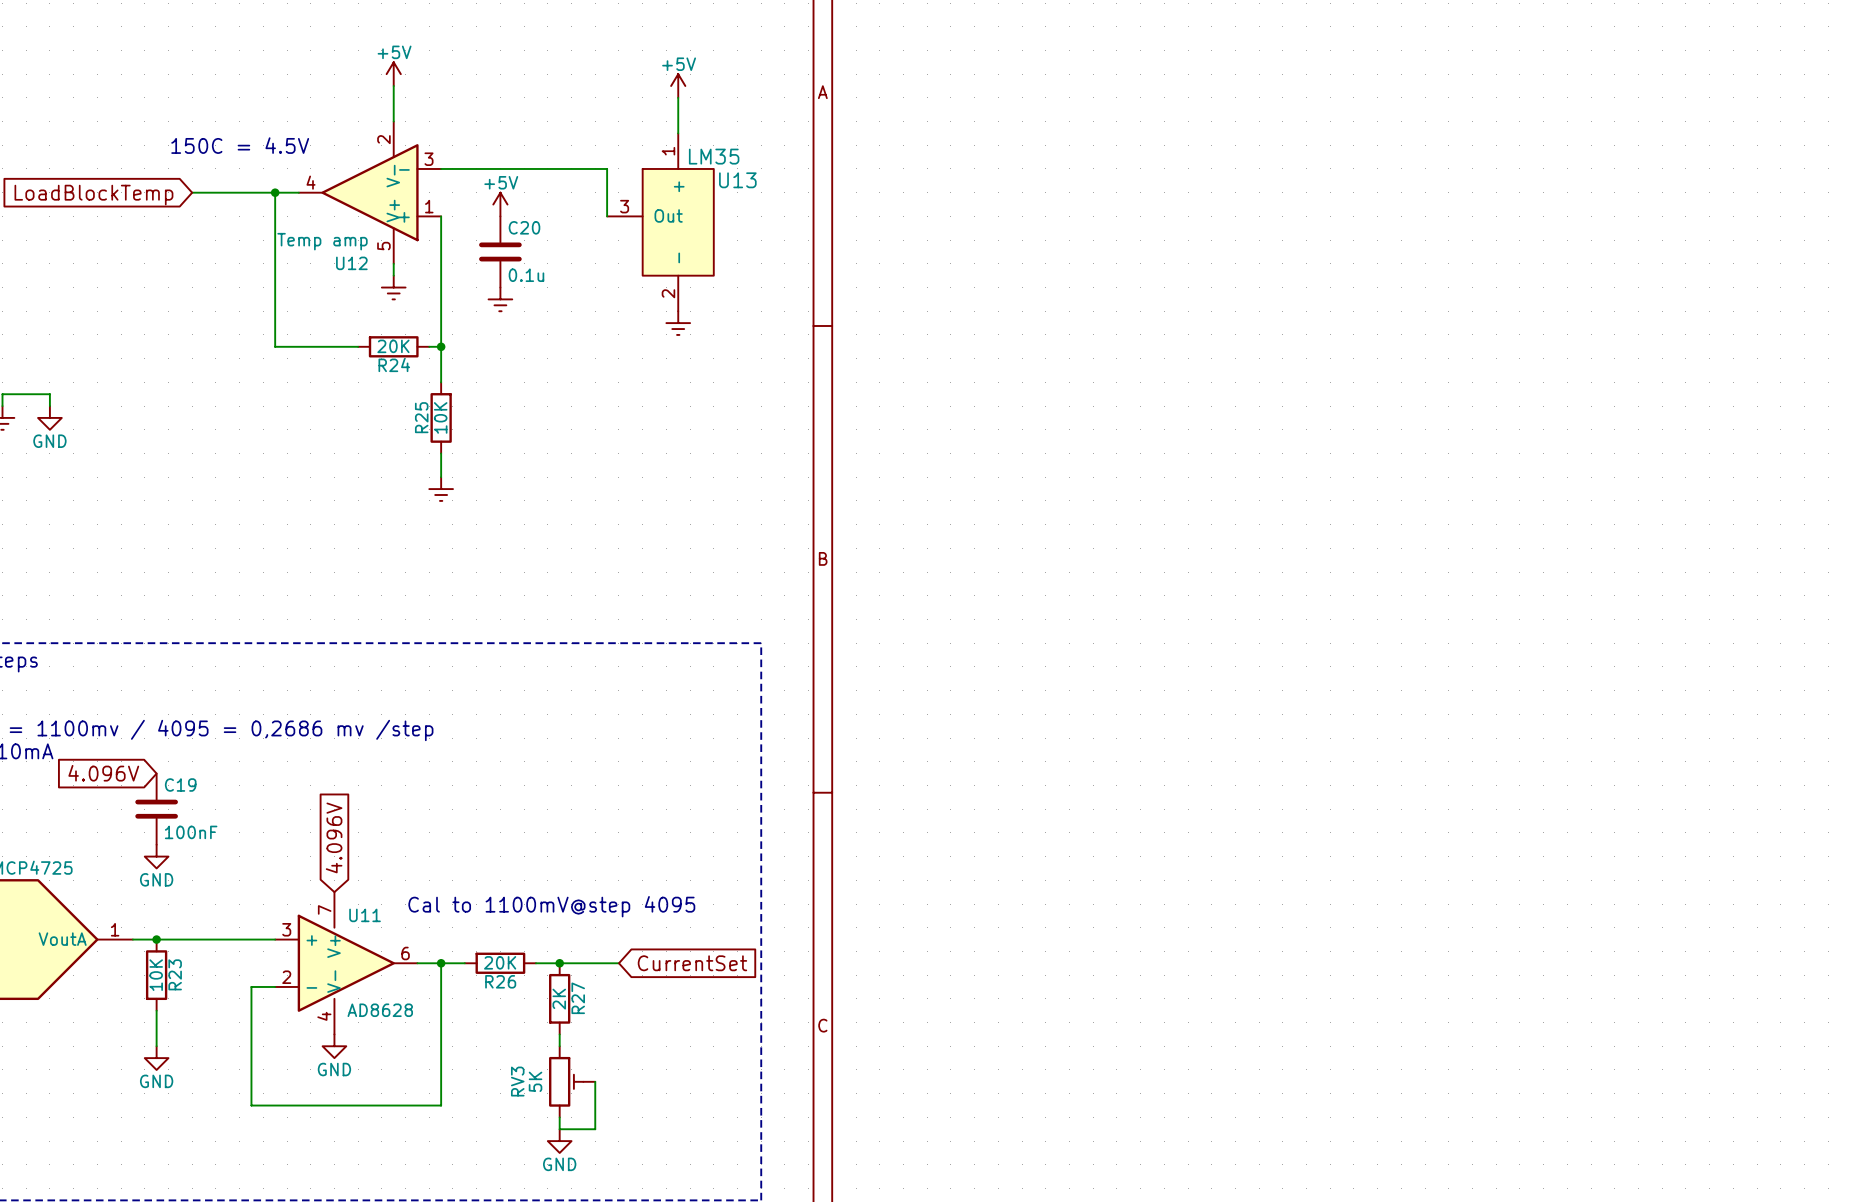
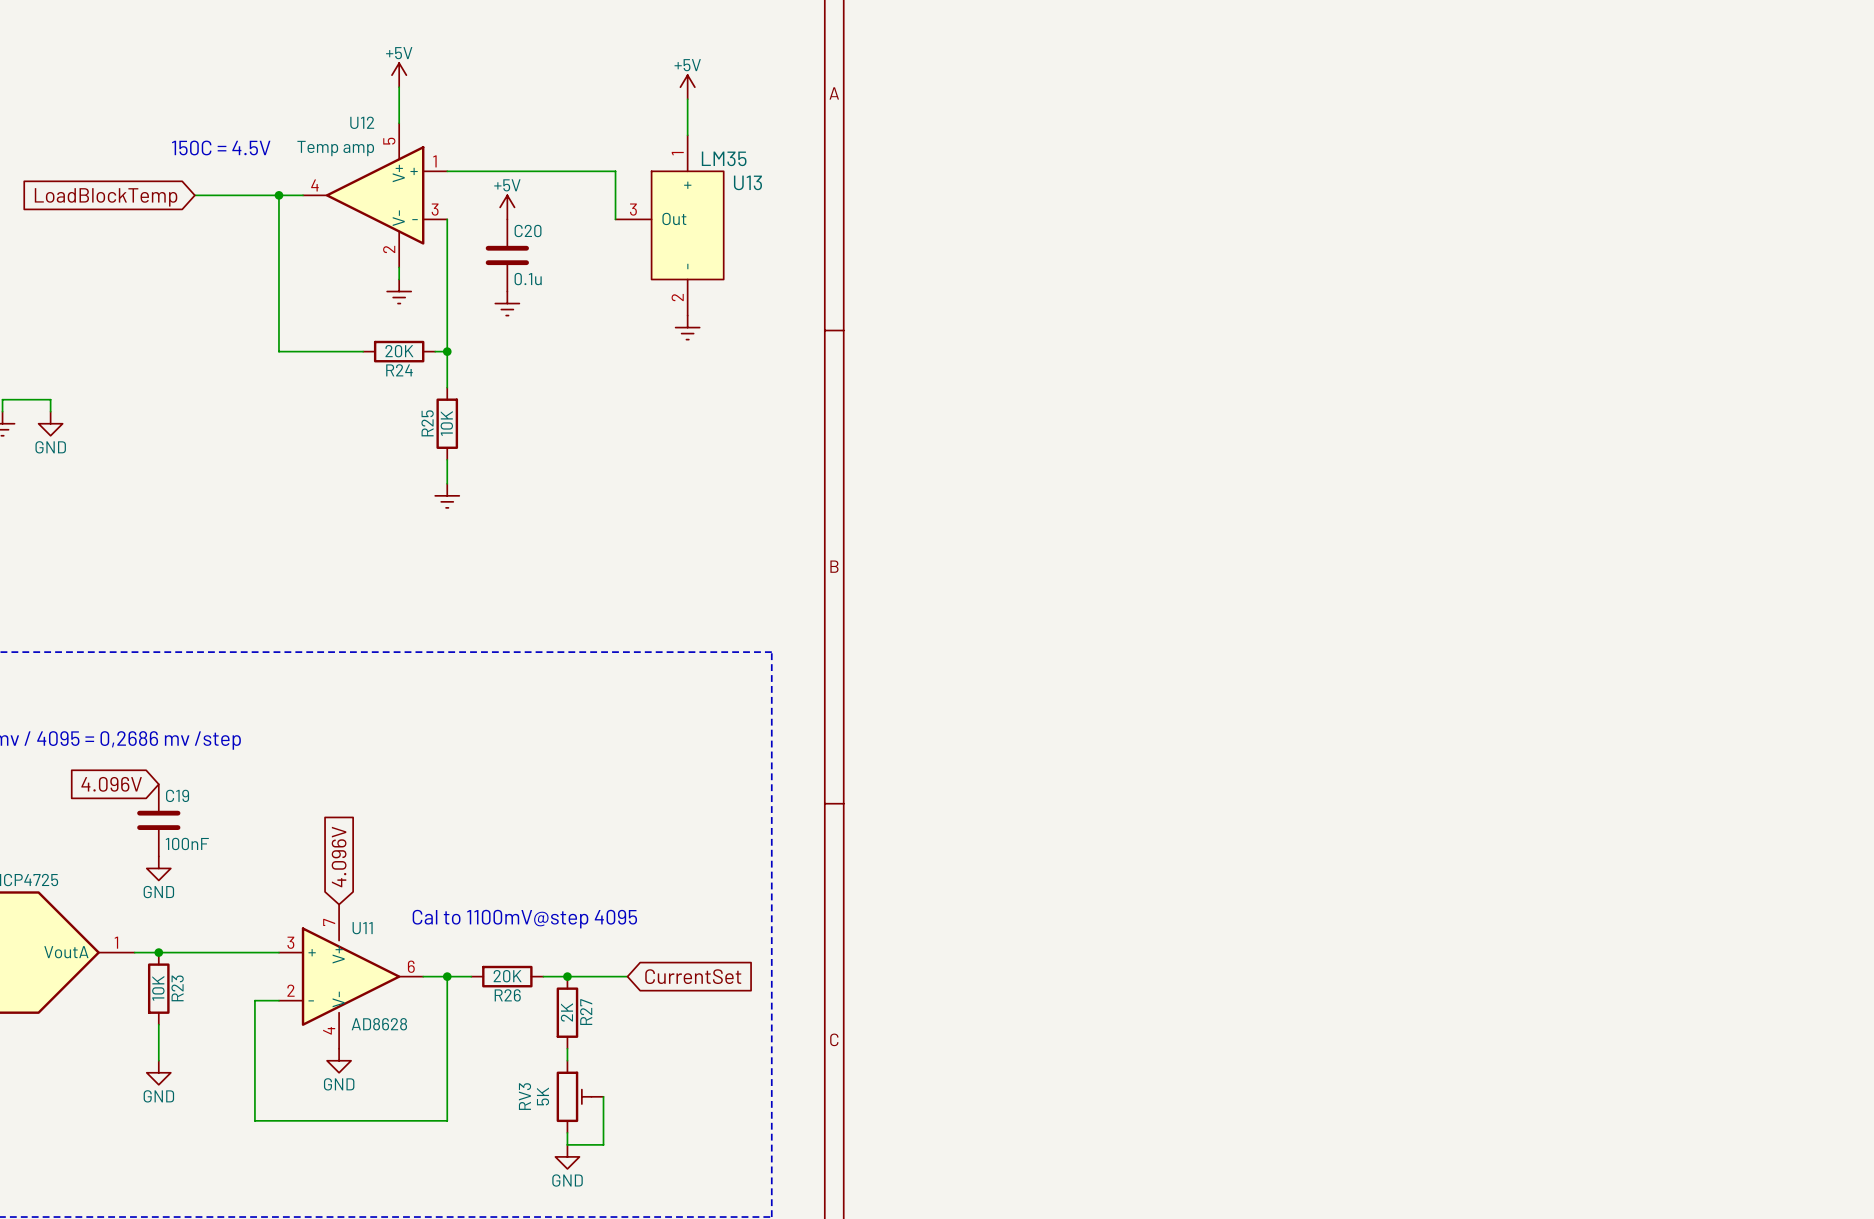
U12 flip: as is (370, 192) -> up-down (375, 195)

